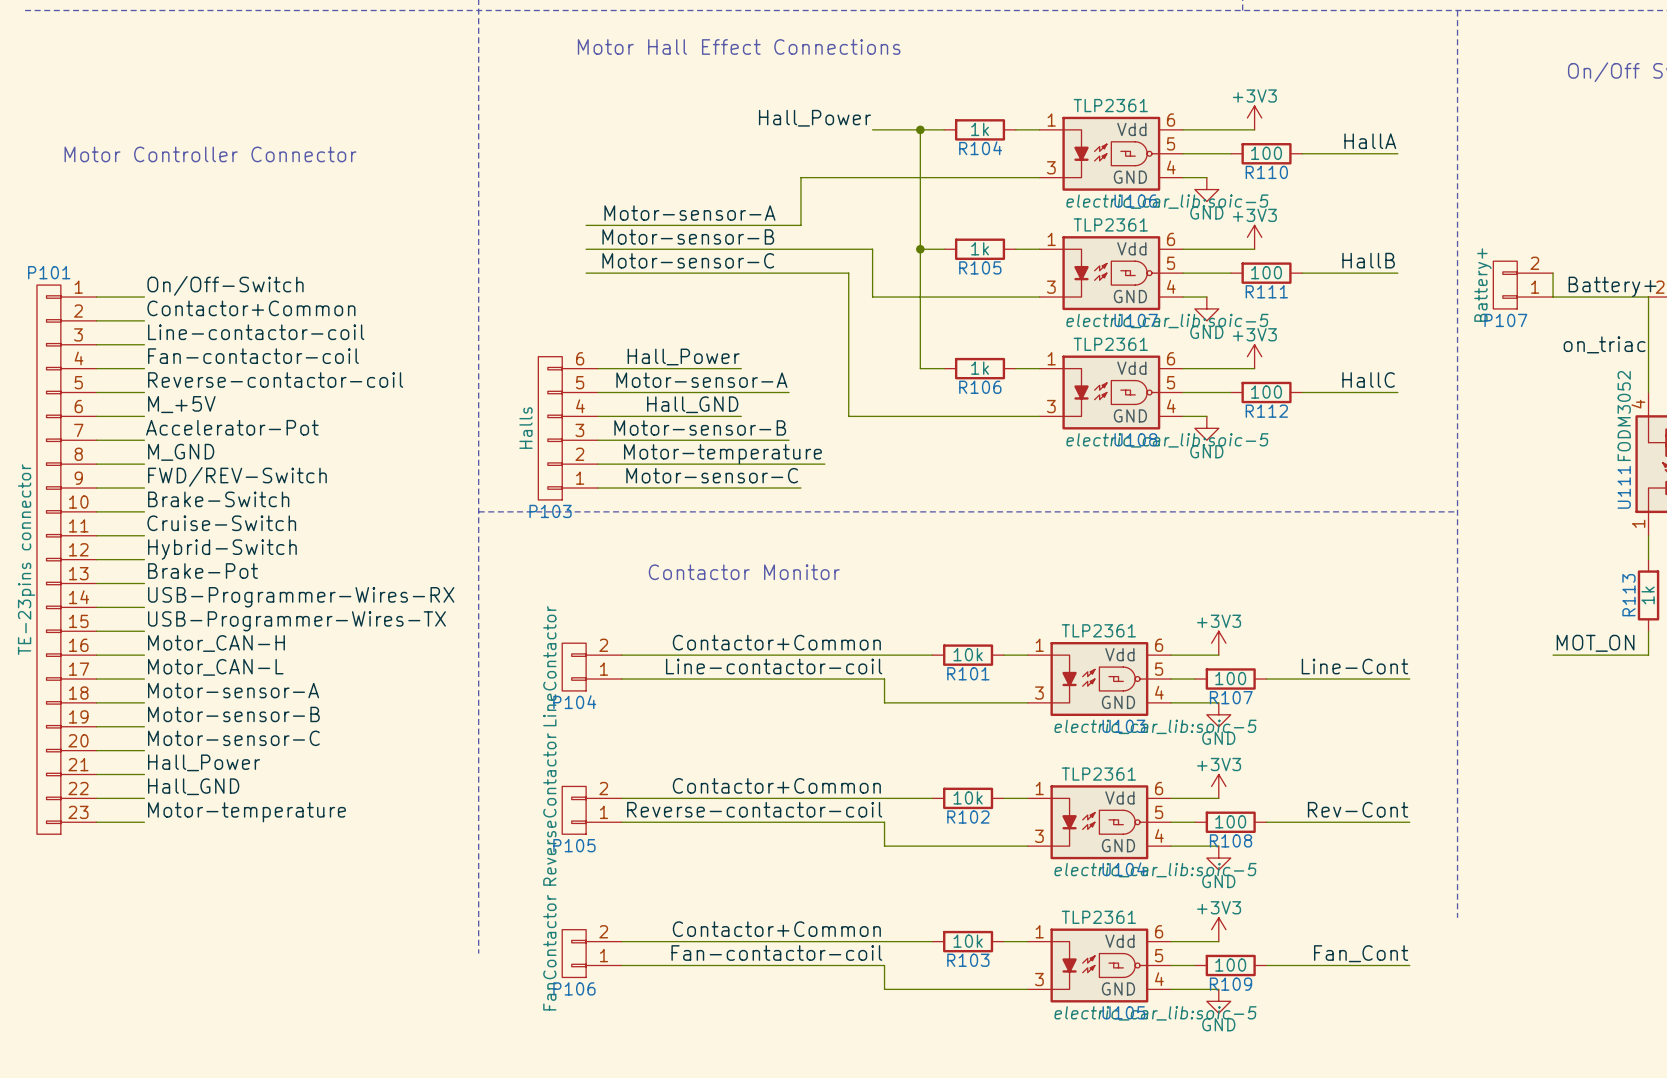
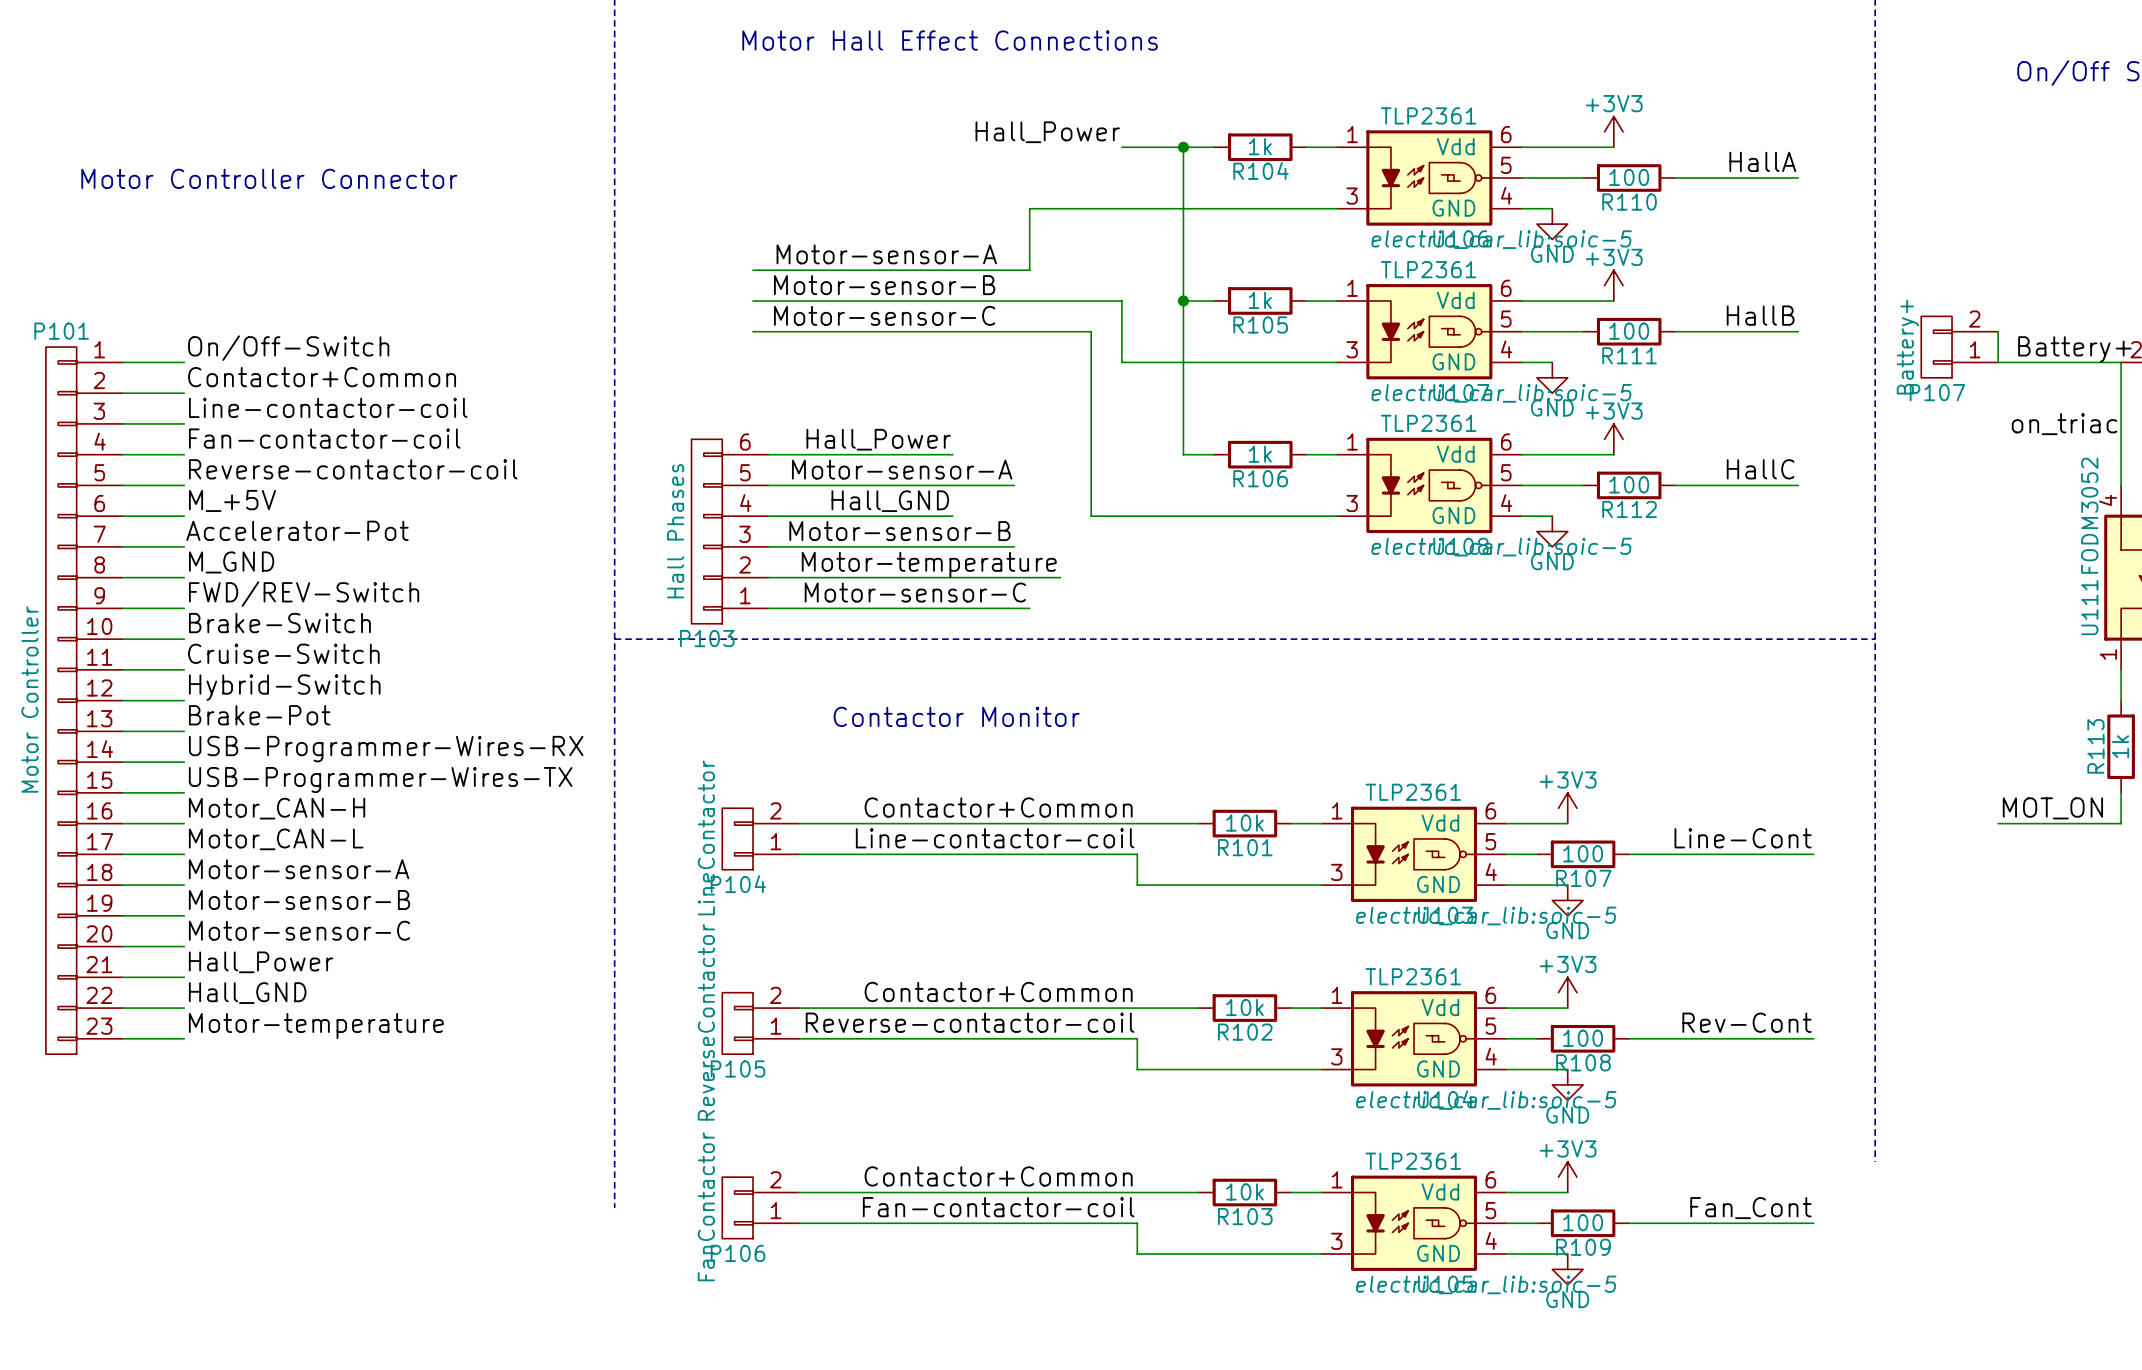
P103 value: Halls (525, 428) -> Hall Phases (675, 531)
P101 value: TE-23pins connector (26, 559) -> Motor Controller (29, 699)

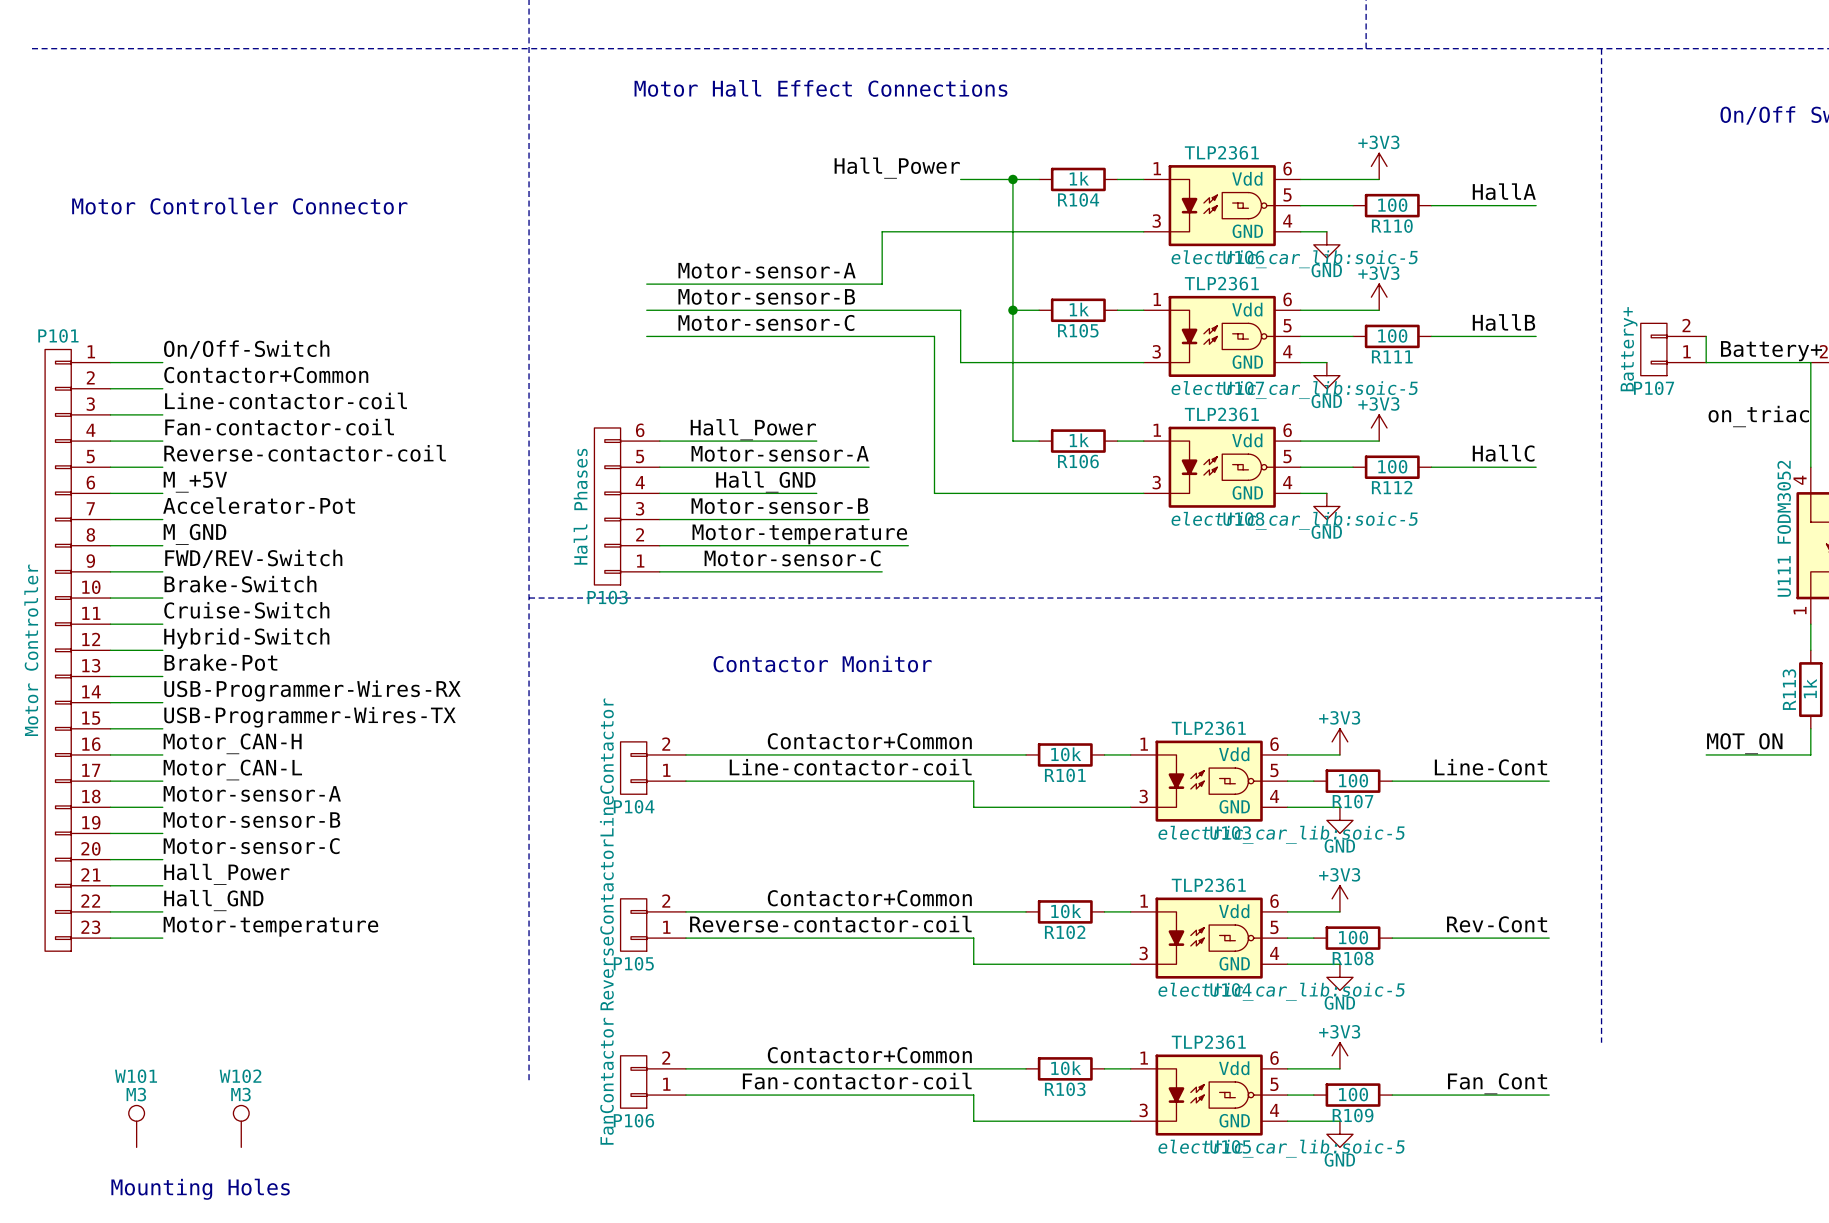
W101: none -> M3 (136, 1126)
W102: none -> M3 (241, 1126)
text: none -> Mounting Holes (200, 1189)

